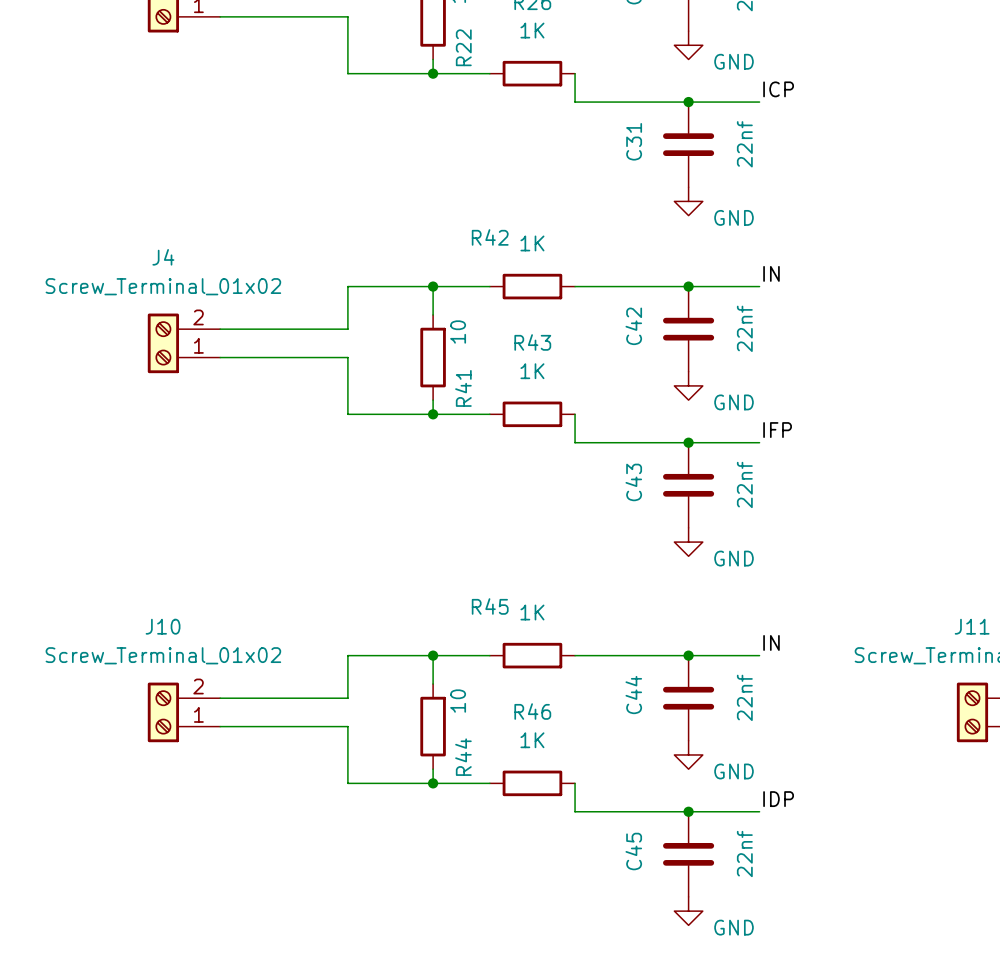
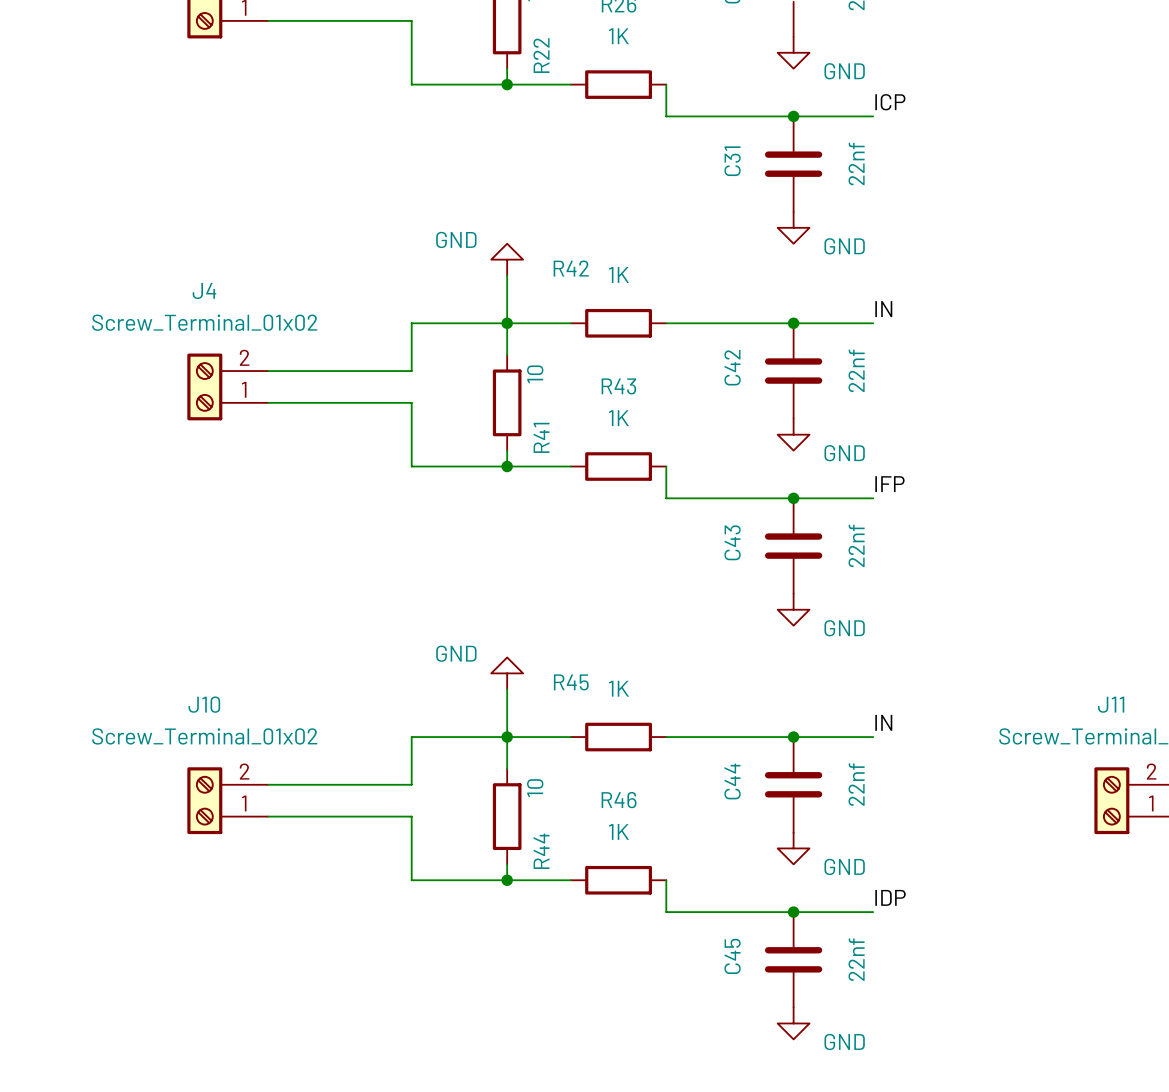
power symbol: none -> GND (507, 259)
wire: none -> (507, 275) (507, 323)
power symbol: none -> GND (507, 673)
wire: none -> (507, 689) (507, 737)

